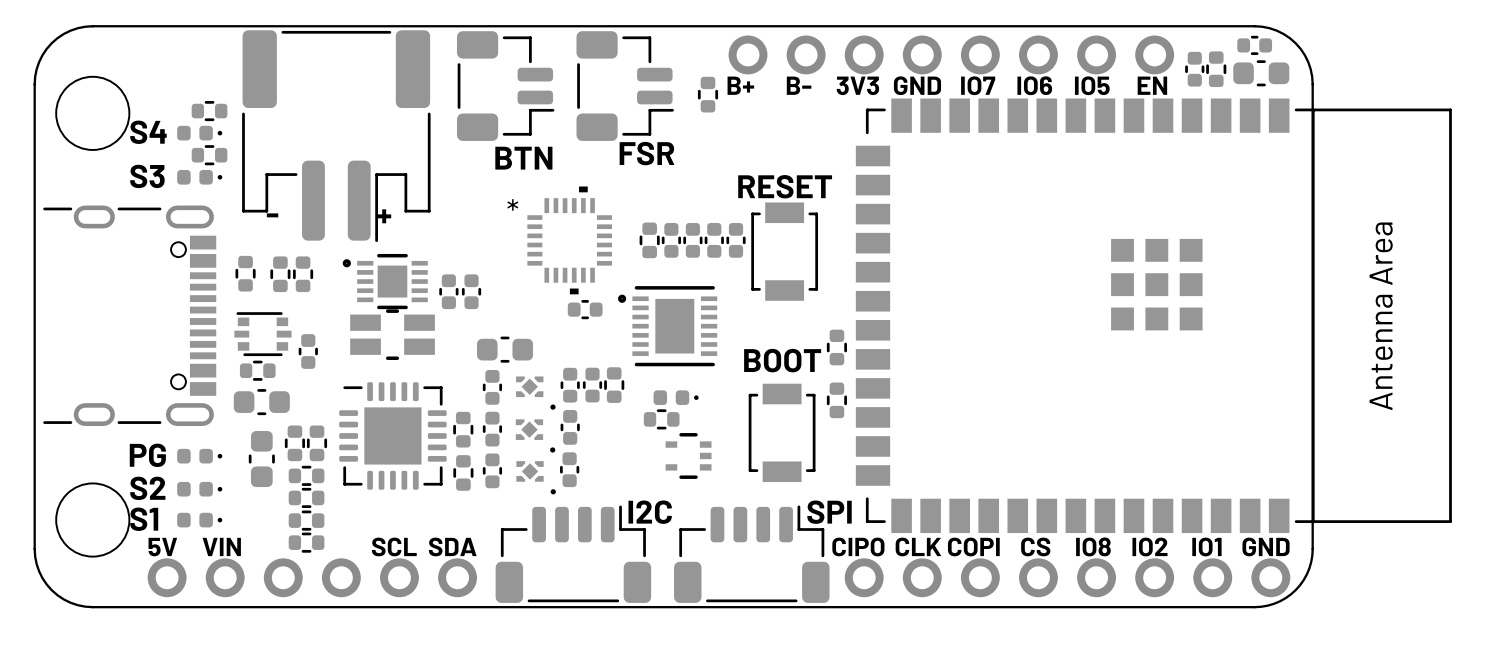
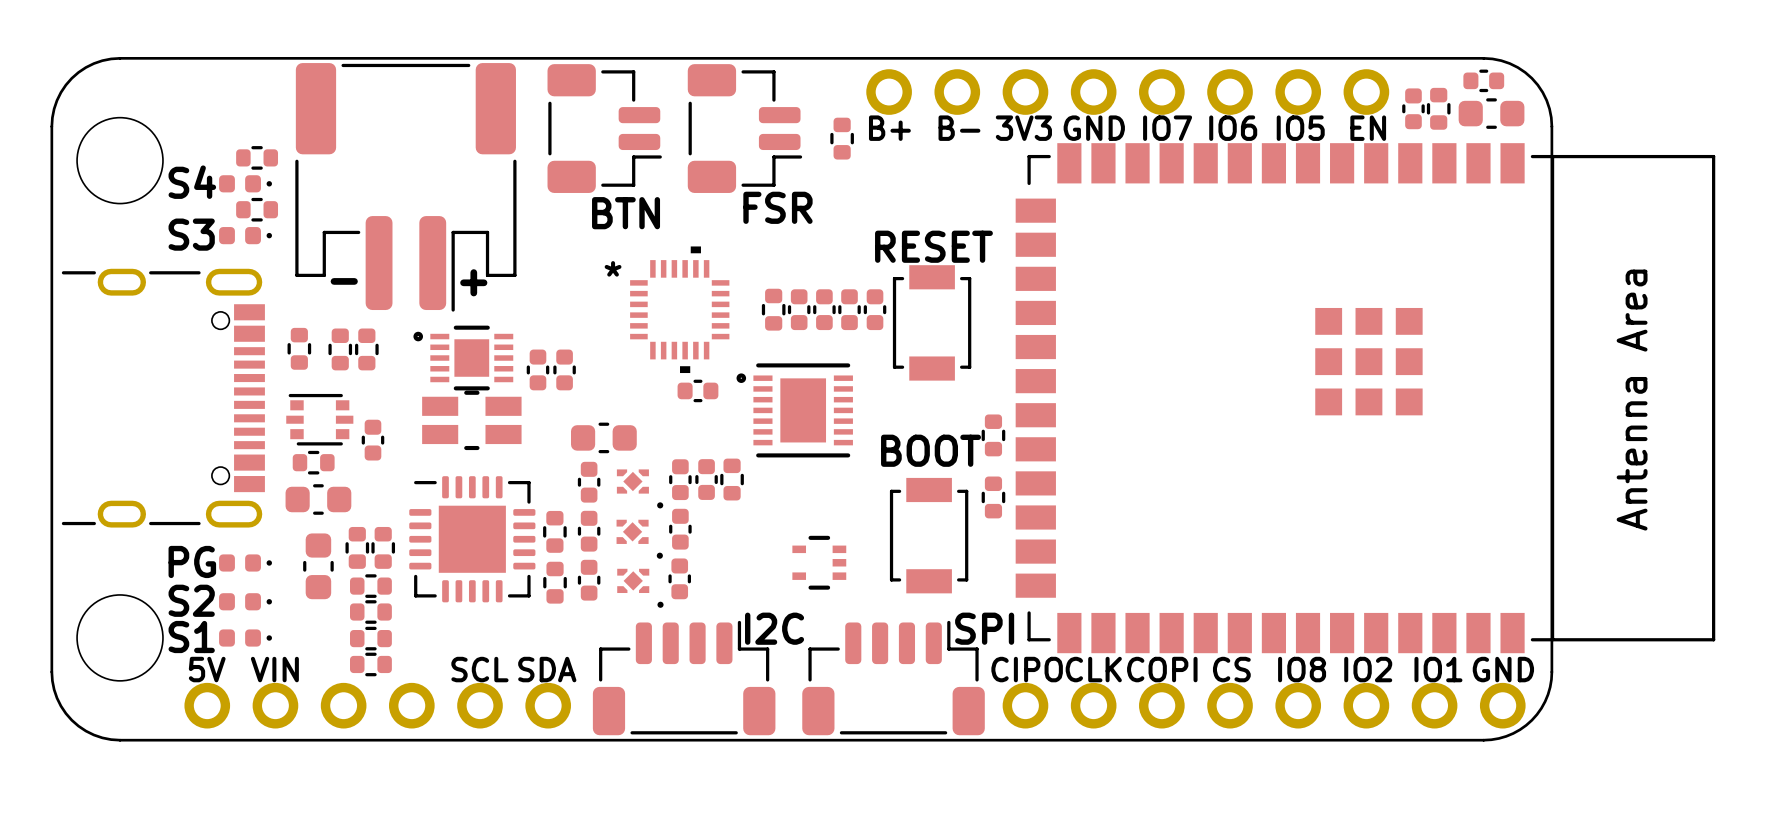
part: (676, 397) -> none
part: (661, 419) -> none

